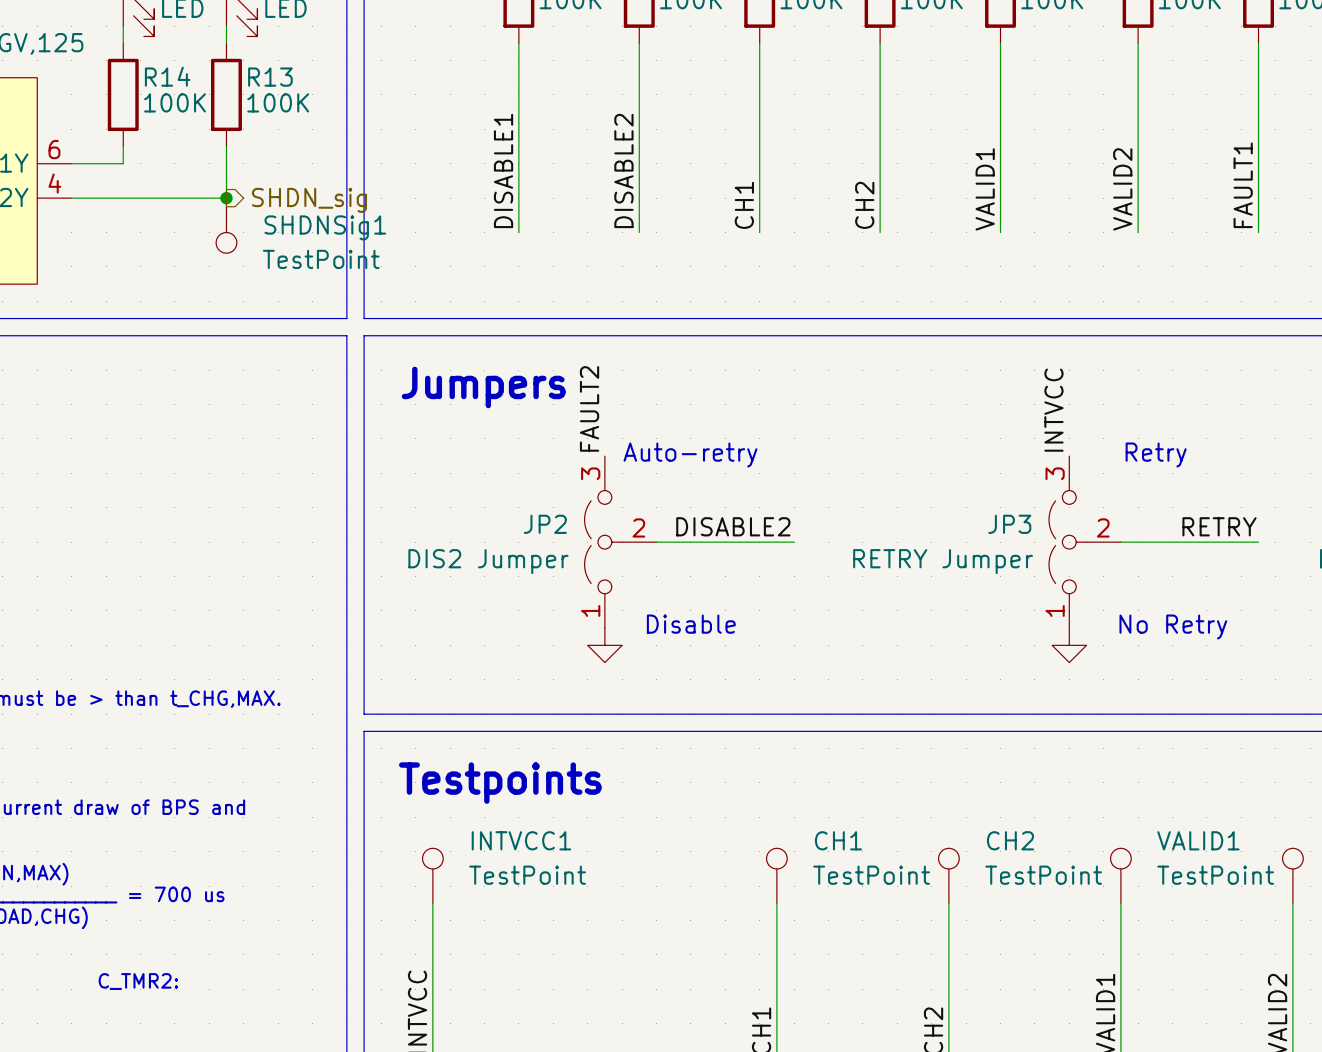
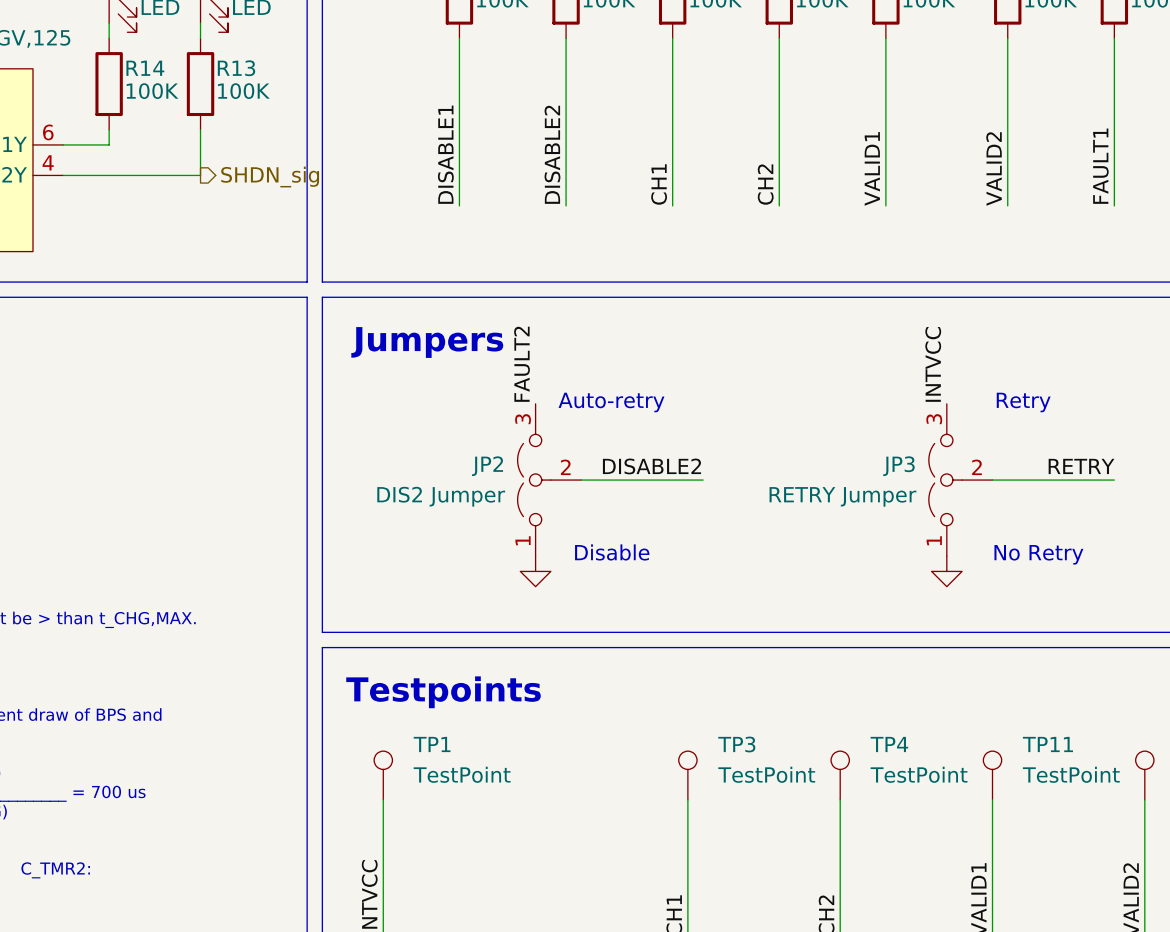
junction: (226, 198) -> none
SHDNSig1: TestPoint (226, 225) -> none
INTVCC1 name: INTVCC1 (521, 840) -> TP1 (432, 744)
CH1 name: CH1 (838, 840) -> TP3 (736, 744)
CH2 name: CH2 (1010, 840) -> TP4 (889, 744)
VALID1 name: VALID1 (1198, 840) -> TP11 (1047, 744)

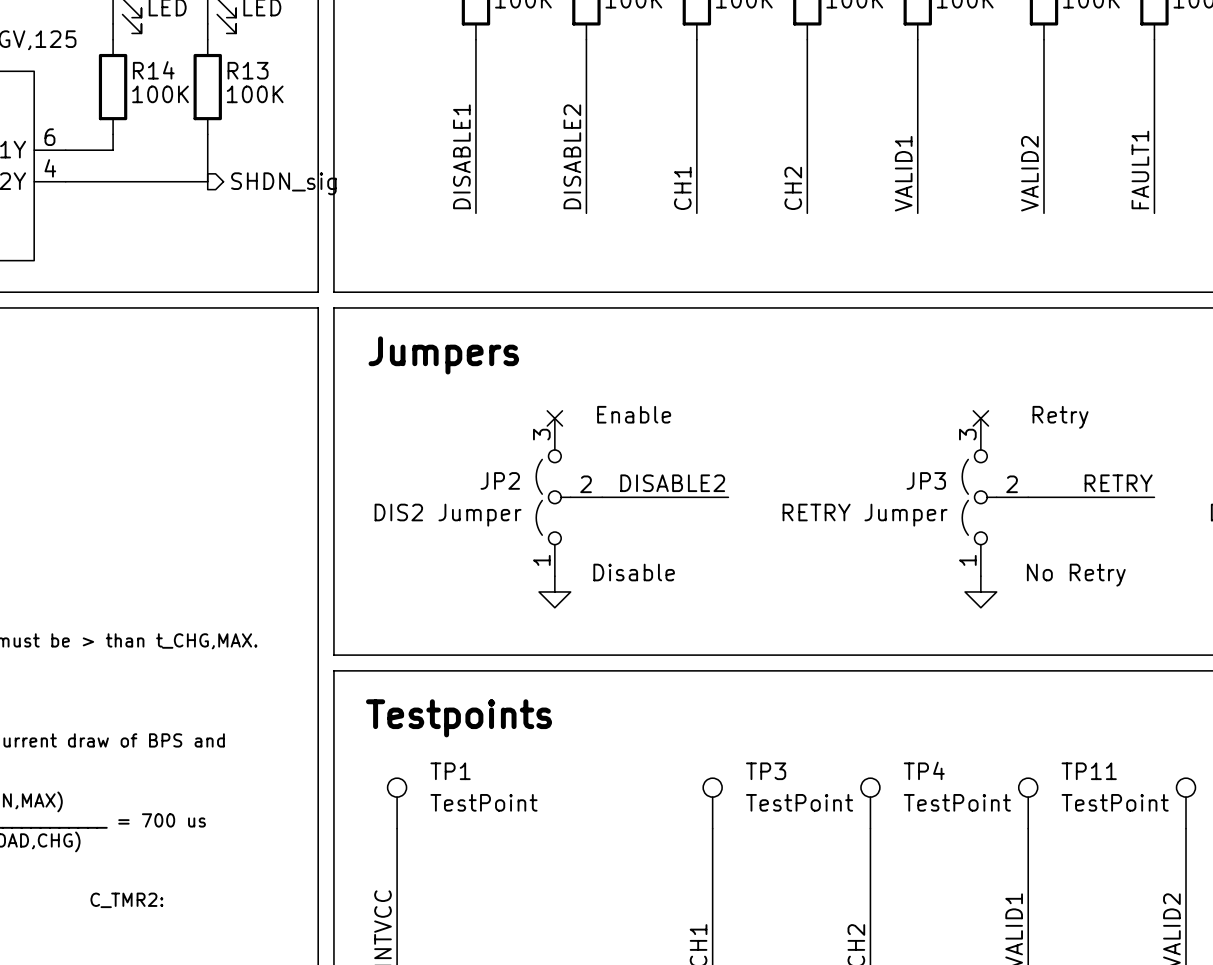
label: FAULT2 (522, 364) -> none
label: INTVCC (933, 364) -> none
text: Auto-retry (611, 402) -> Enable (634, 414)
no-connect mark: none -> (554, 418)
no-connect mark: none -> (980, 418)

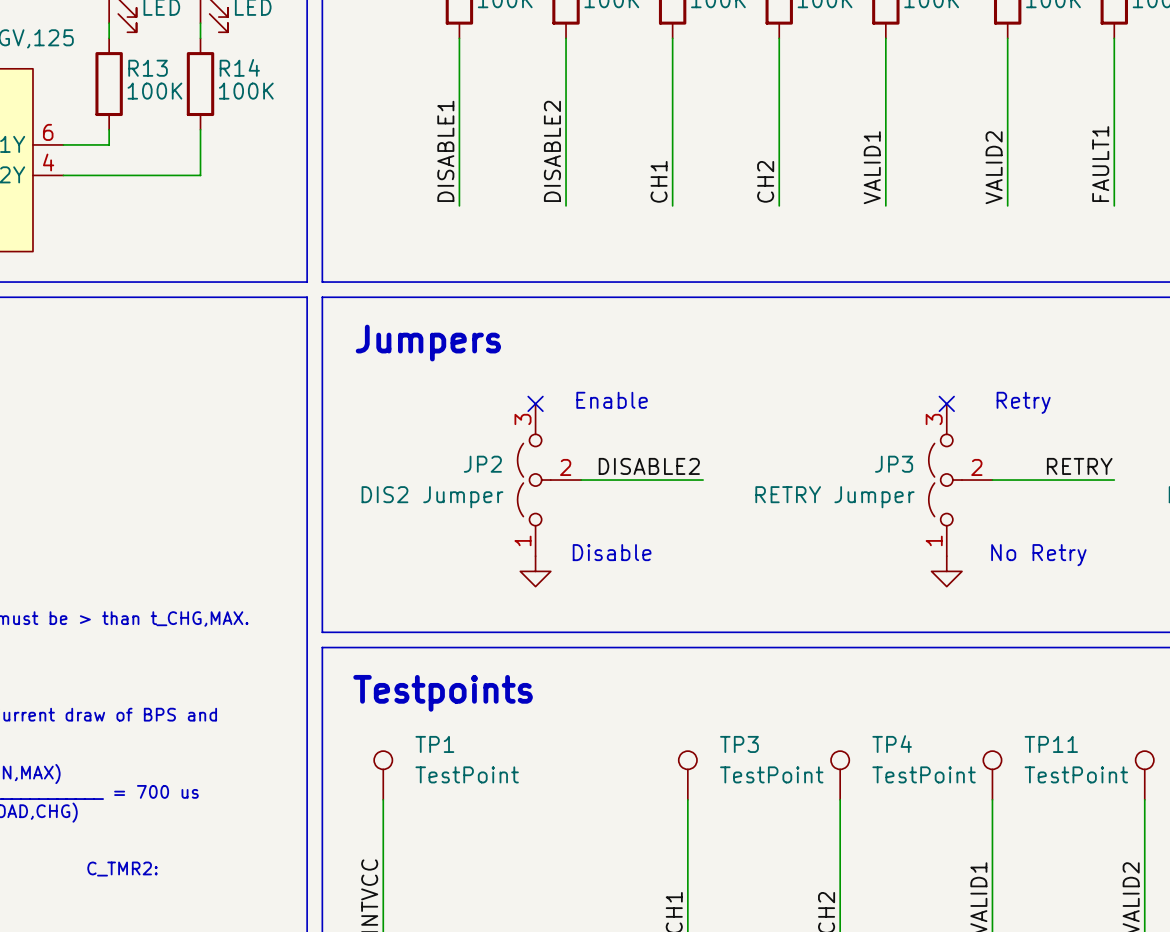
R14 name: R14 (153, 70) -> R13 (148, 68)
R13 name: R13 (248, 70) -> R14 (239, 67)
hierarchical label: SHDN_sig (283, 183) -> none

